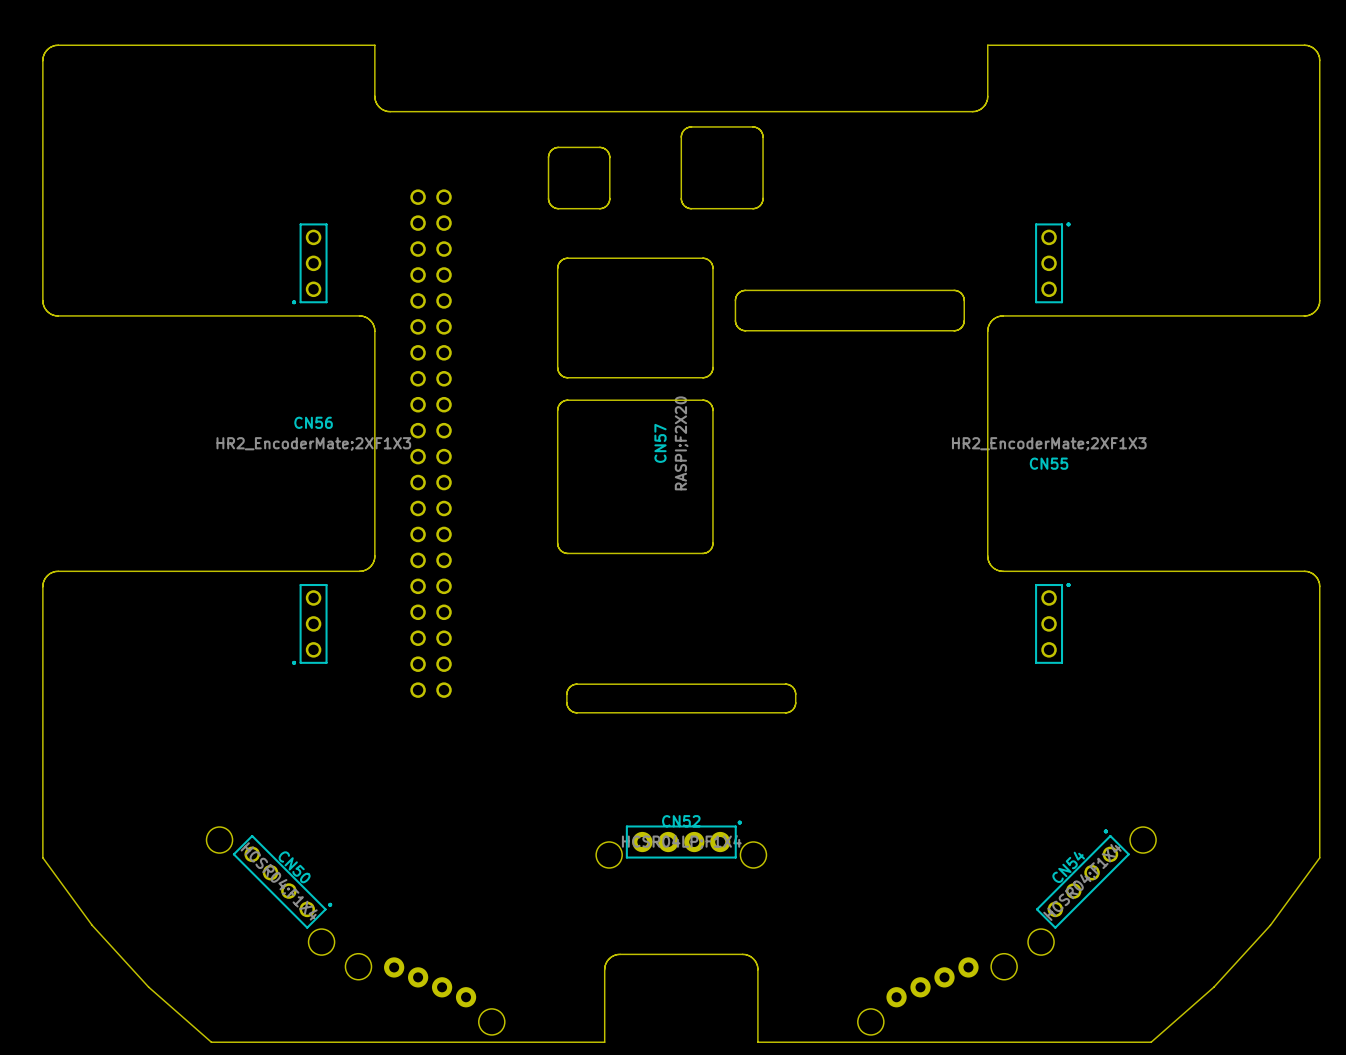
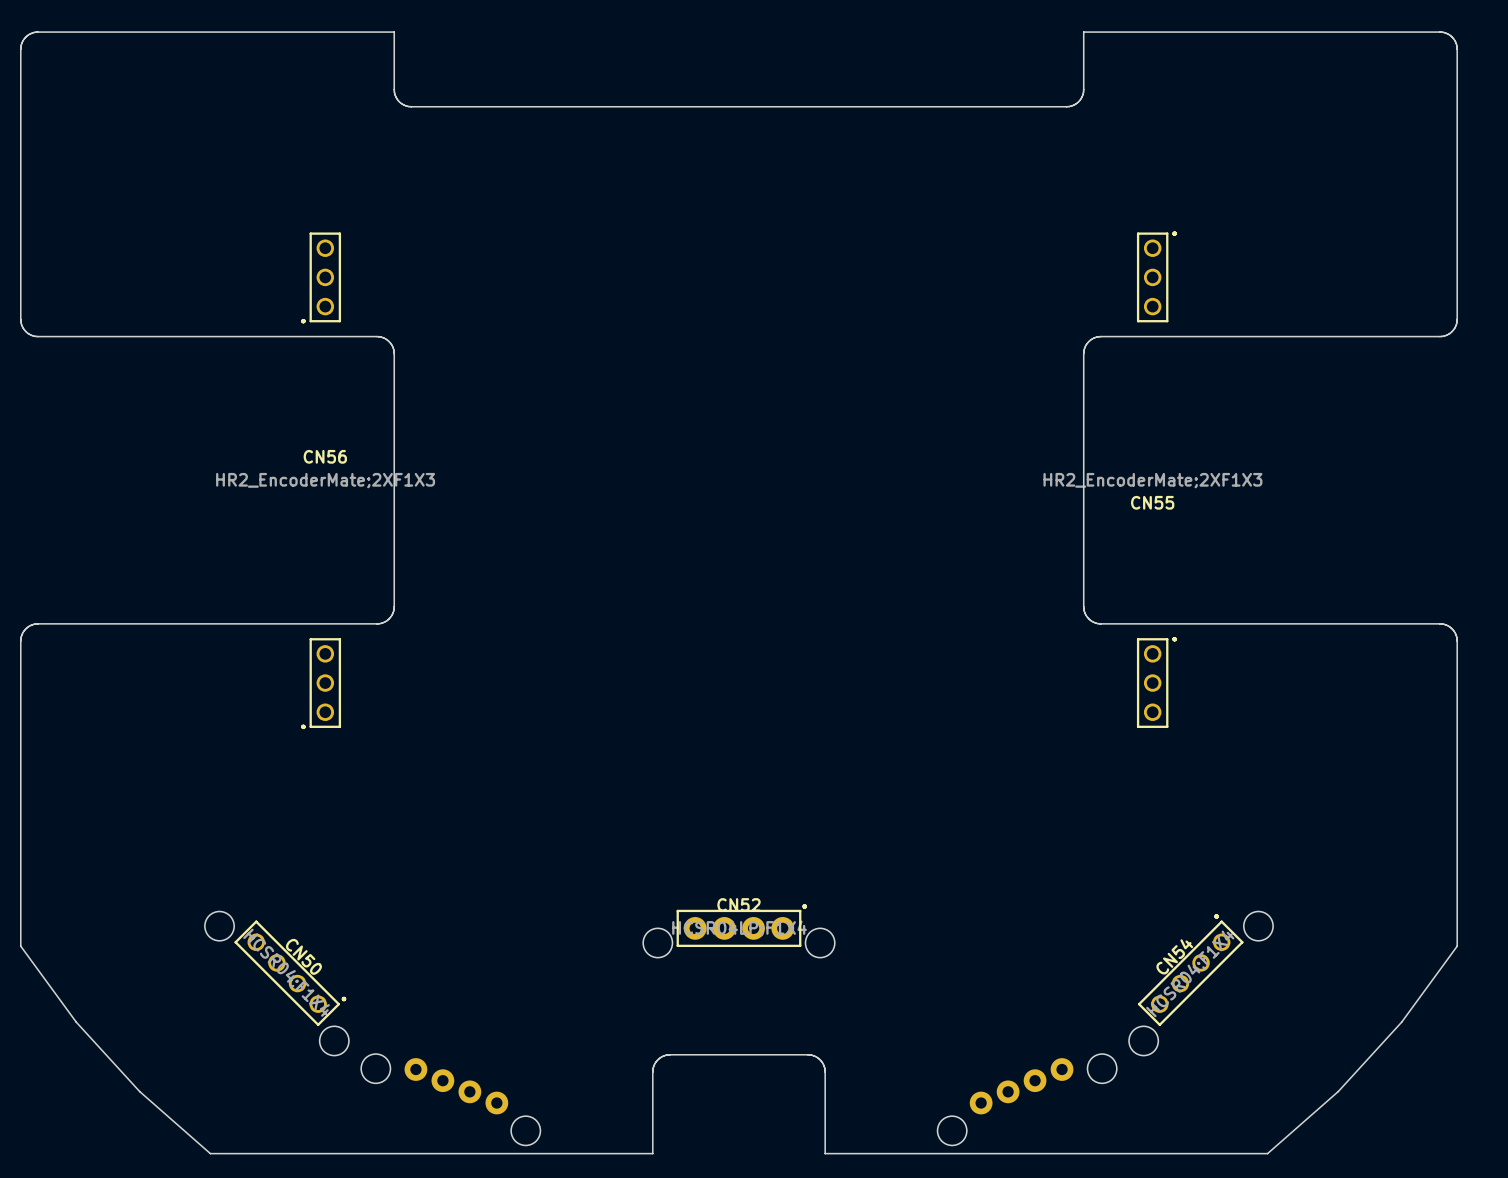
board edge: (690, 126) (753, 126) (760, 129) (763, 136) (763, 199) (760, 205) (753, 208) (690, 208) (684, 205) (681, 199) (681, 136) (684, 129) (690, 126) -> none
board edge: (557, 147) (600, 147) (607, 151) (609, 156) (609, 199) (606, 206) (600, 208) (557, 208) (550, 205) (548, 199) (548, 156) (551, 150) (557, 147) -> none
board edge: (567, 258) (703, 258) (709, 260) (712, 267) (712, 368) (710, 374) (703, 377) (567, 377) (561, 375) (557, 368) (557, 267) (560, 261) (567, 258) -> none
board edge: (744, 290) (954, 290) (960, 292) (963, 297) (964, 321) (961, 327) (954, 330) (744, 330) (738, 327) (735, 321) (735, 297) (739, 292) (744, 290) -> none
board edge: (567, 400) (703, 400) (710, 403) (712, 409) (712, 544) (710, 550) (703, 553) (567, 553) (560, 550) (557, 544) (557, 409) (560, 403) (567, 400) -> none
CN57: RASPI;F2X20 (431, 443) -> none
board edge: (576, 684) (786, 684) (794, 690) (795, 703) (792, 709) (786, 712) (576, 712) (569, 709) (566, 703) (567, 690) (576, 684) -> none

